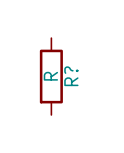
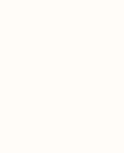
R?: R (51, 76) -> none

